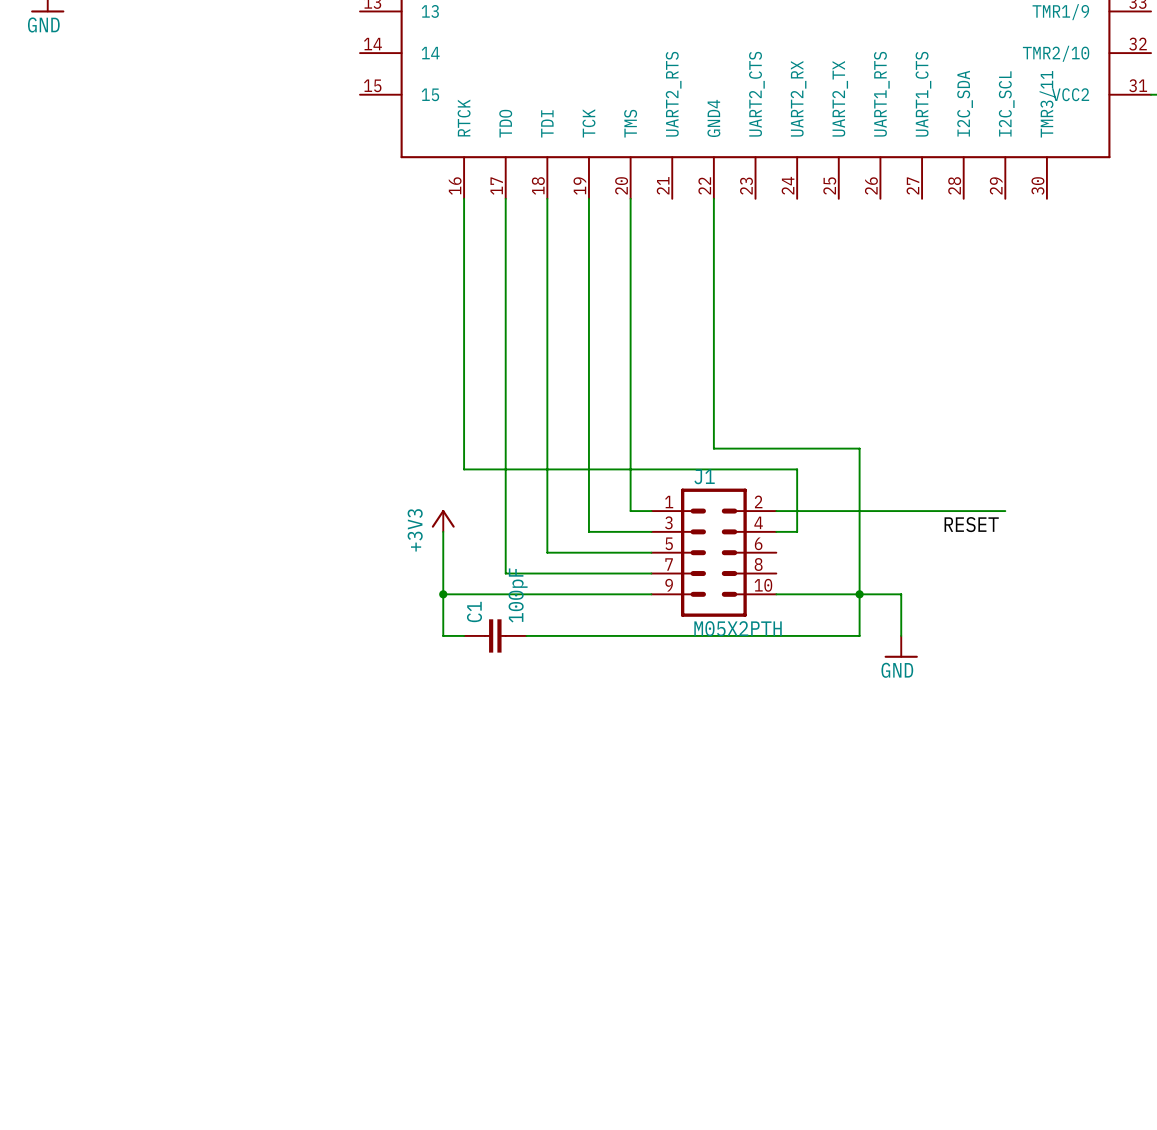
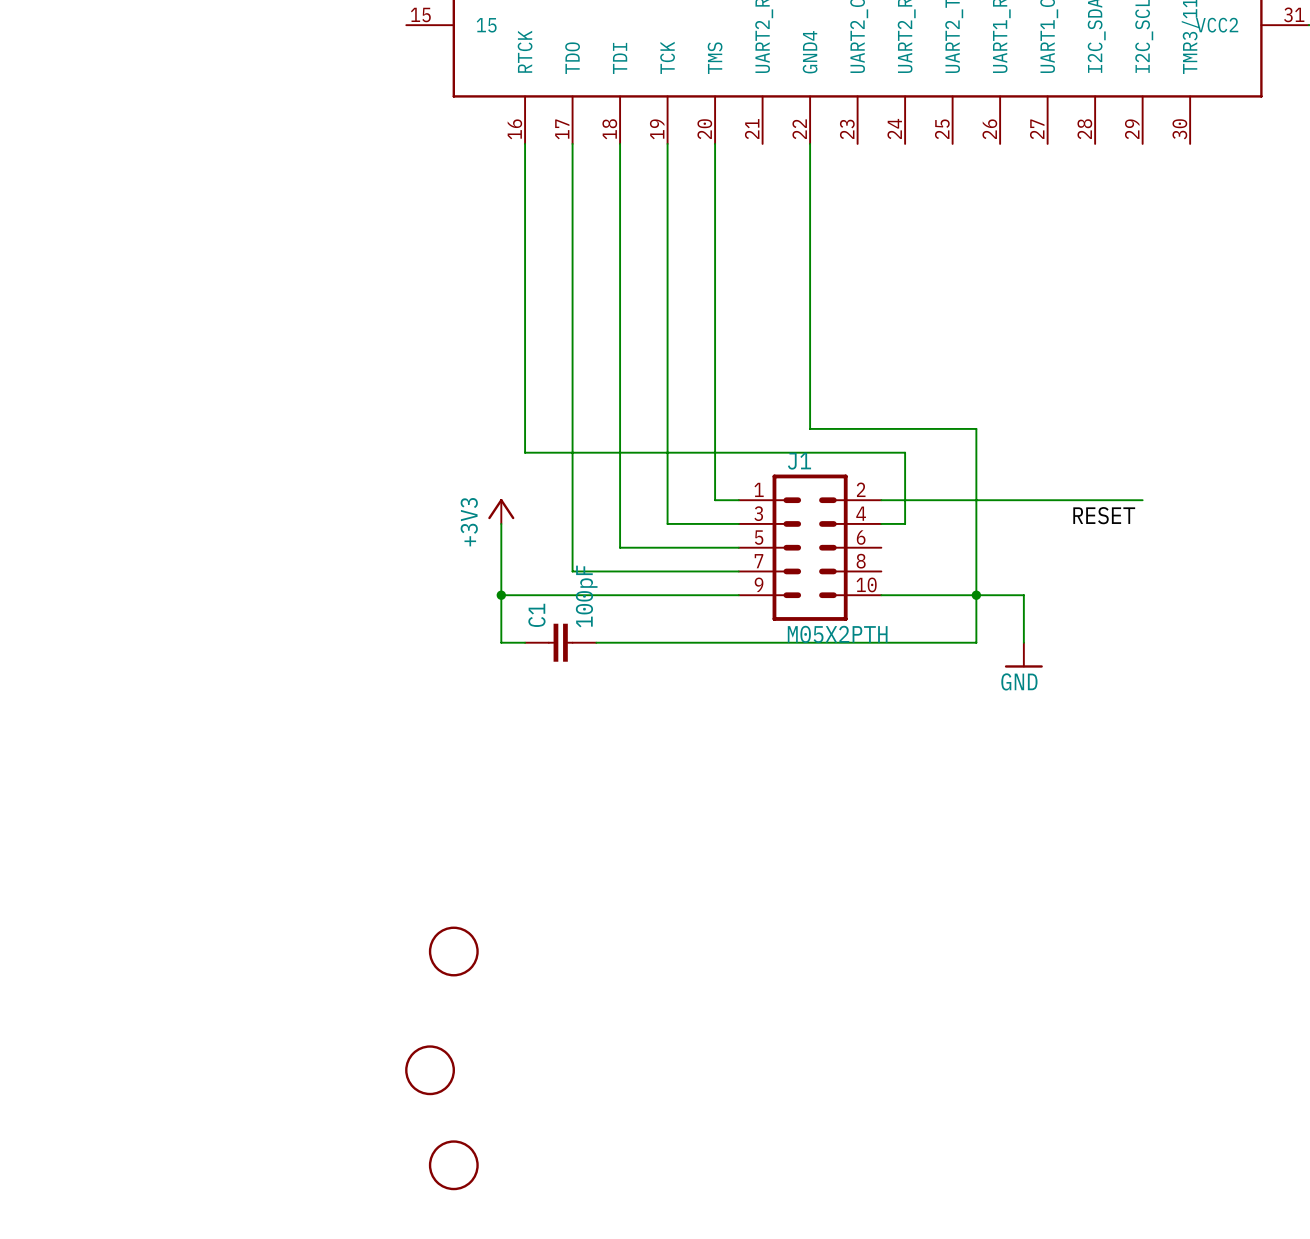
part: none -> (453, 951)
part: none -> (430, 1070)
part: none -> (453, 1165)

